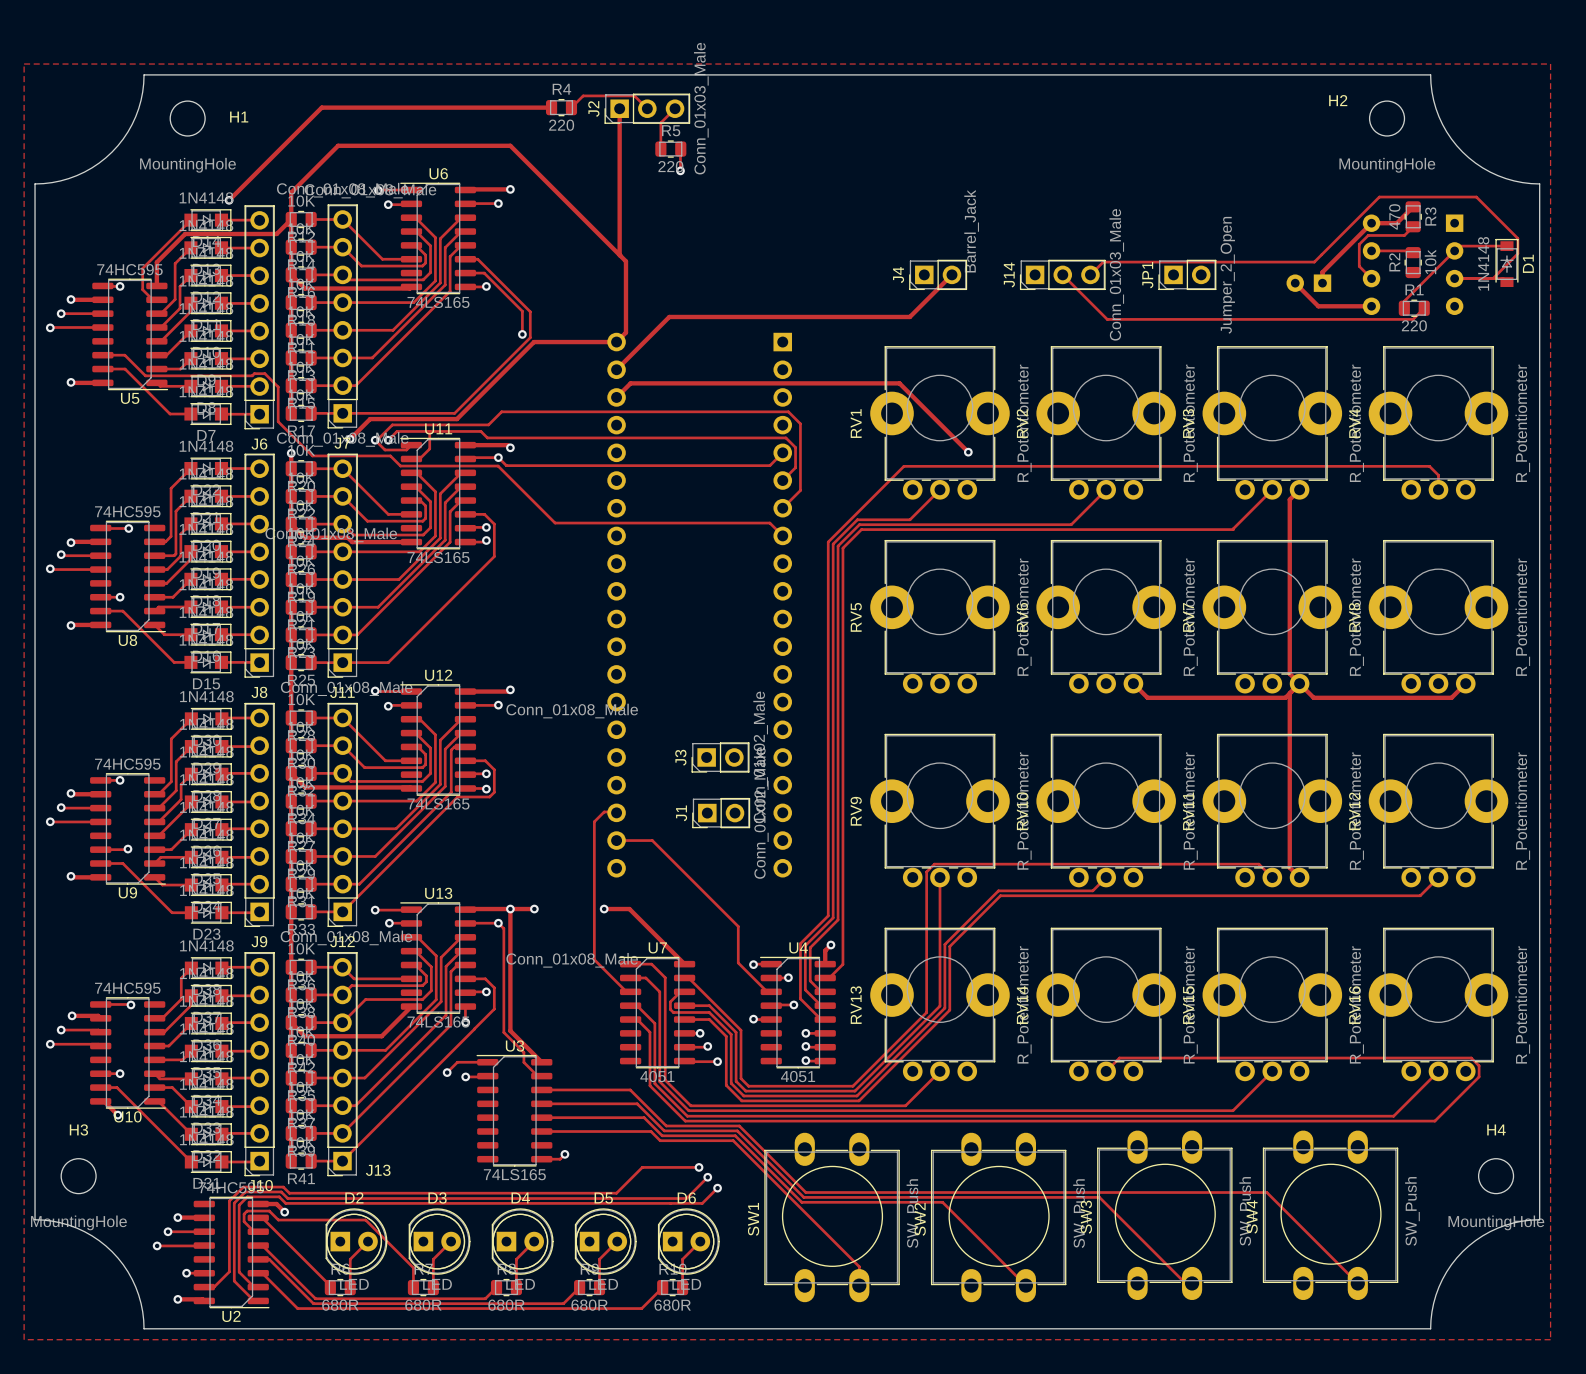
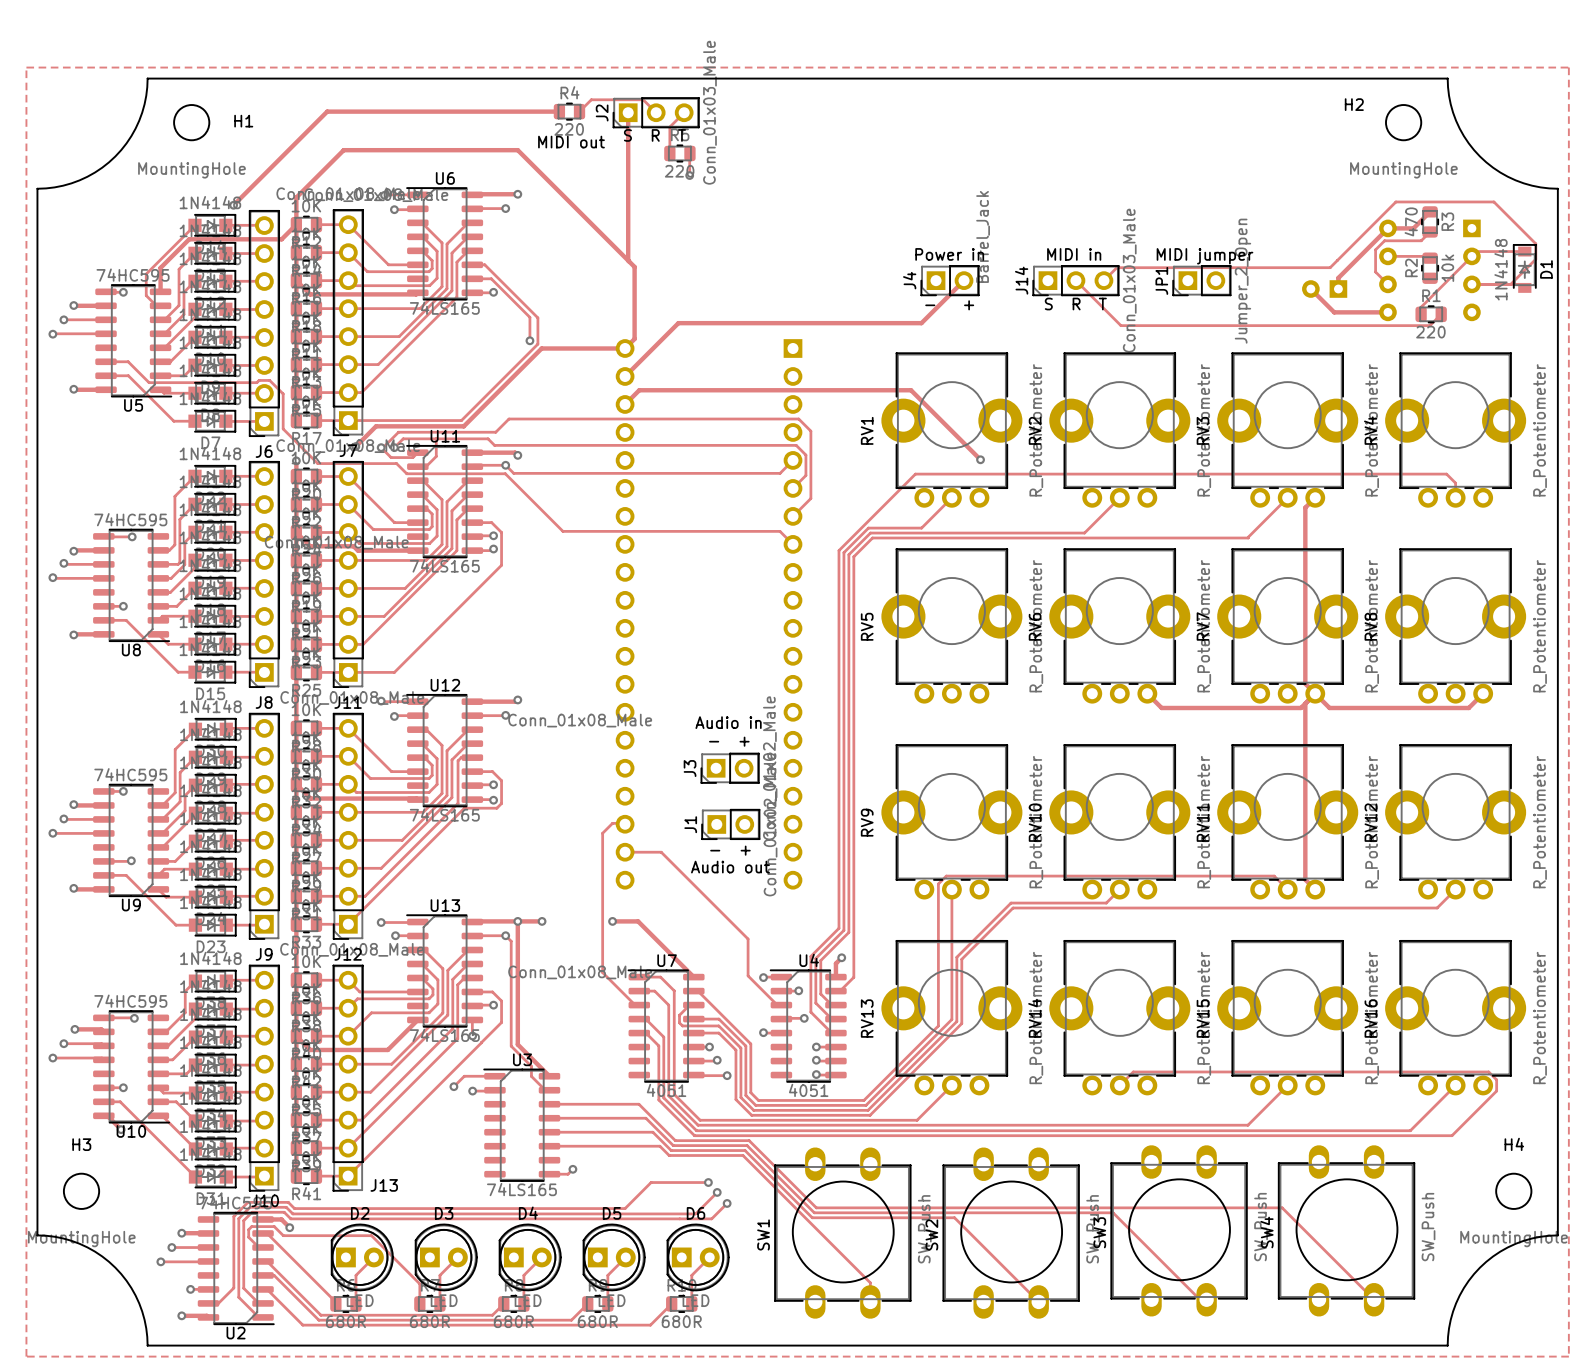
text: none -> S R T (654, 135)
text: none -> MIDI out (571, 142)
text: none -> Power in (949, 254)
text: none -> MIDI in (1074, 254)
text: none -> MIDI jumper (1204, 256)
text: none -> - + (949, 305)
text: none -> S R T (1075, 304)
text: none -> Audio in (728, 722)
text: none -> - + (729, 741)
text: none -> - + (730, 850)
text: none -> Audio out (730, 867)

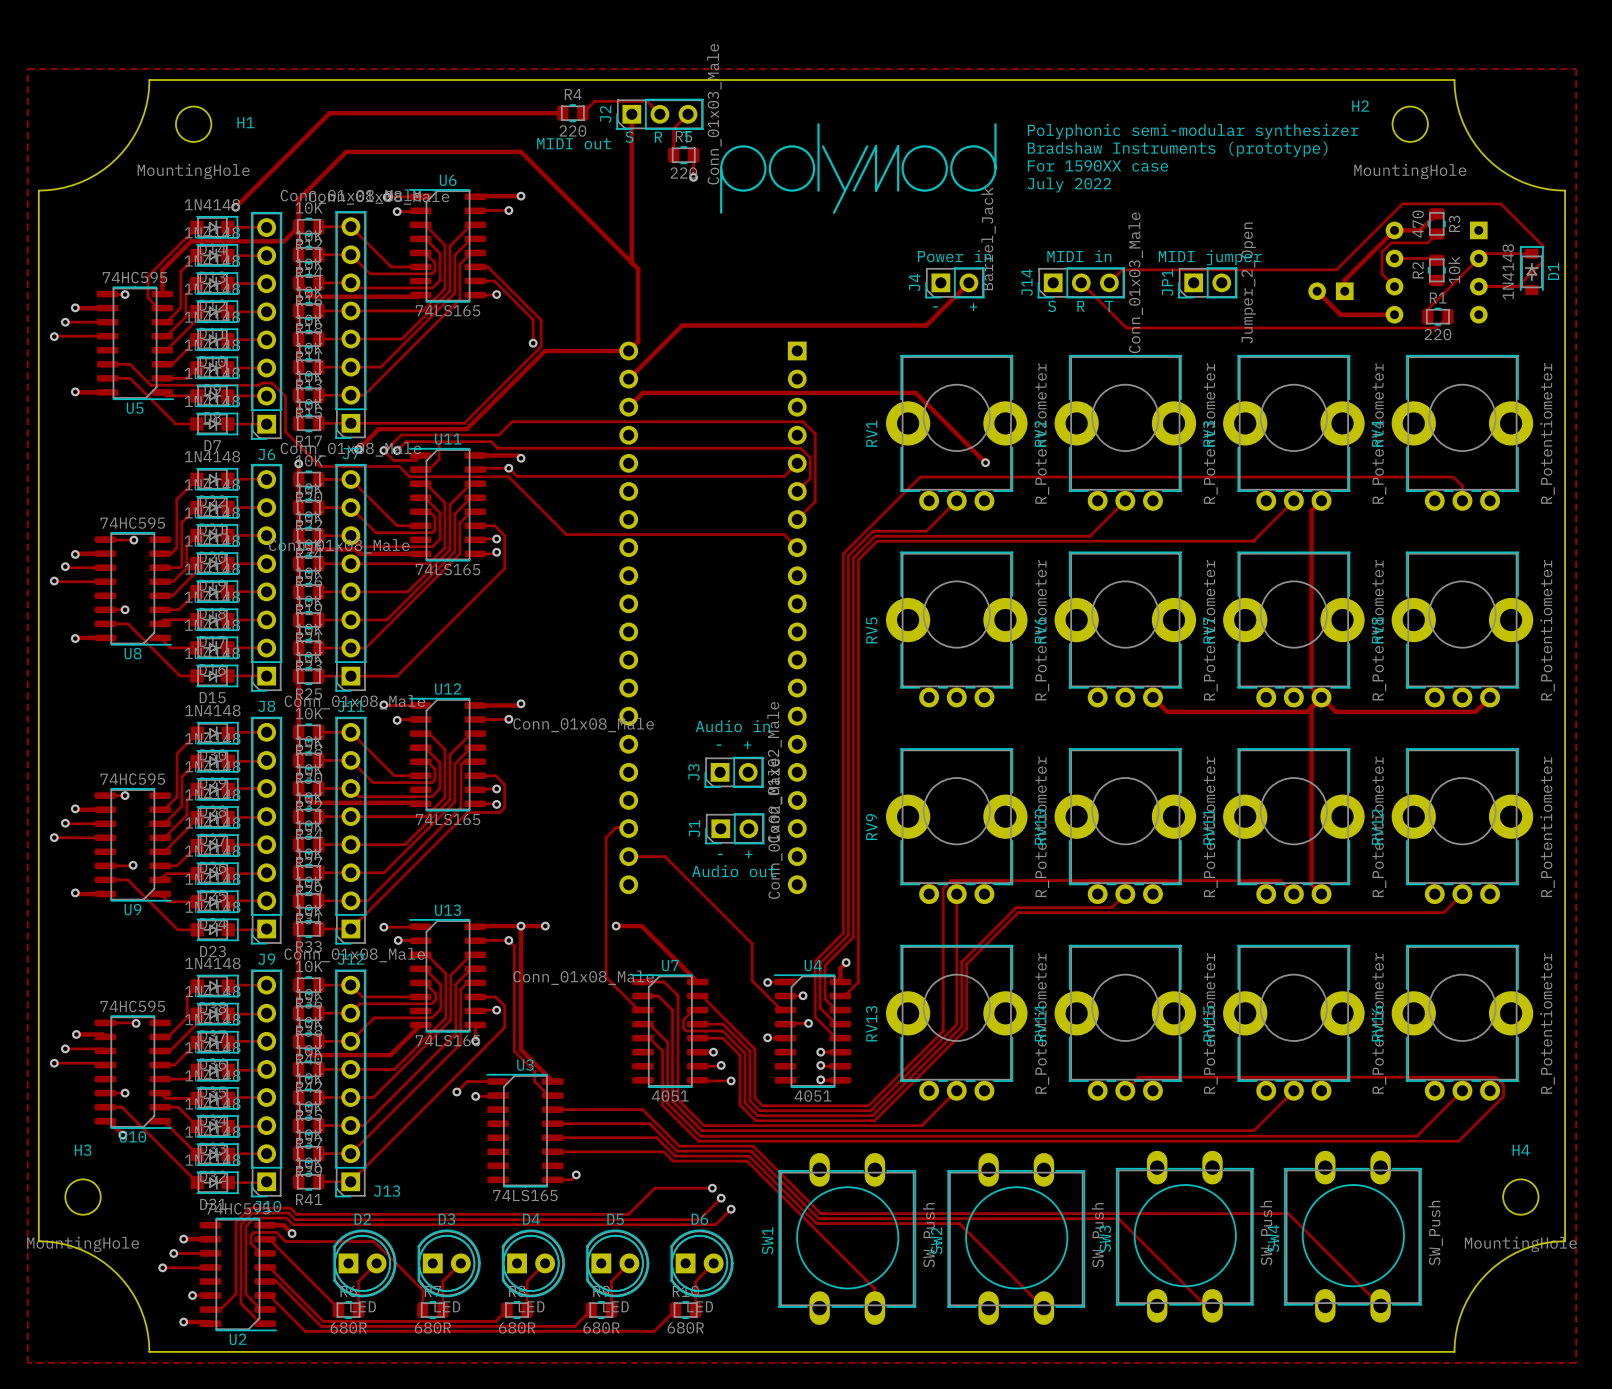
line: none -> (818, 124) (818, 190)
line: none -> (995, 124) (995, 168)
text: none -> Polyphonic semi-modular synthesizer (1193, 131)
drawing: none -> [720, 145, 816, 192]
drawing: none -> [901, 145, 997, 192]
line: none -> (822, 146) (845, 190)
line: none -> (867, 146) (834, 212)
text: none -> Bradshaw Instruments (prototype) (1177, 149)
text: none -> For 1590XX case (1097, 165)
line: none -> (721, 168) (721, 212)
text: none -> July 2022 (1069, 184)
line: none -> (853, 190) (876, 146) (876, 190) (898, 146) (898, 190)

